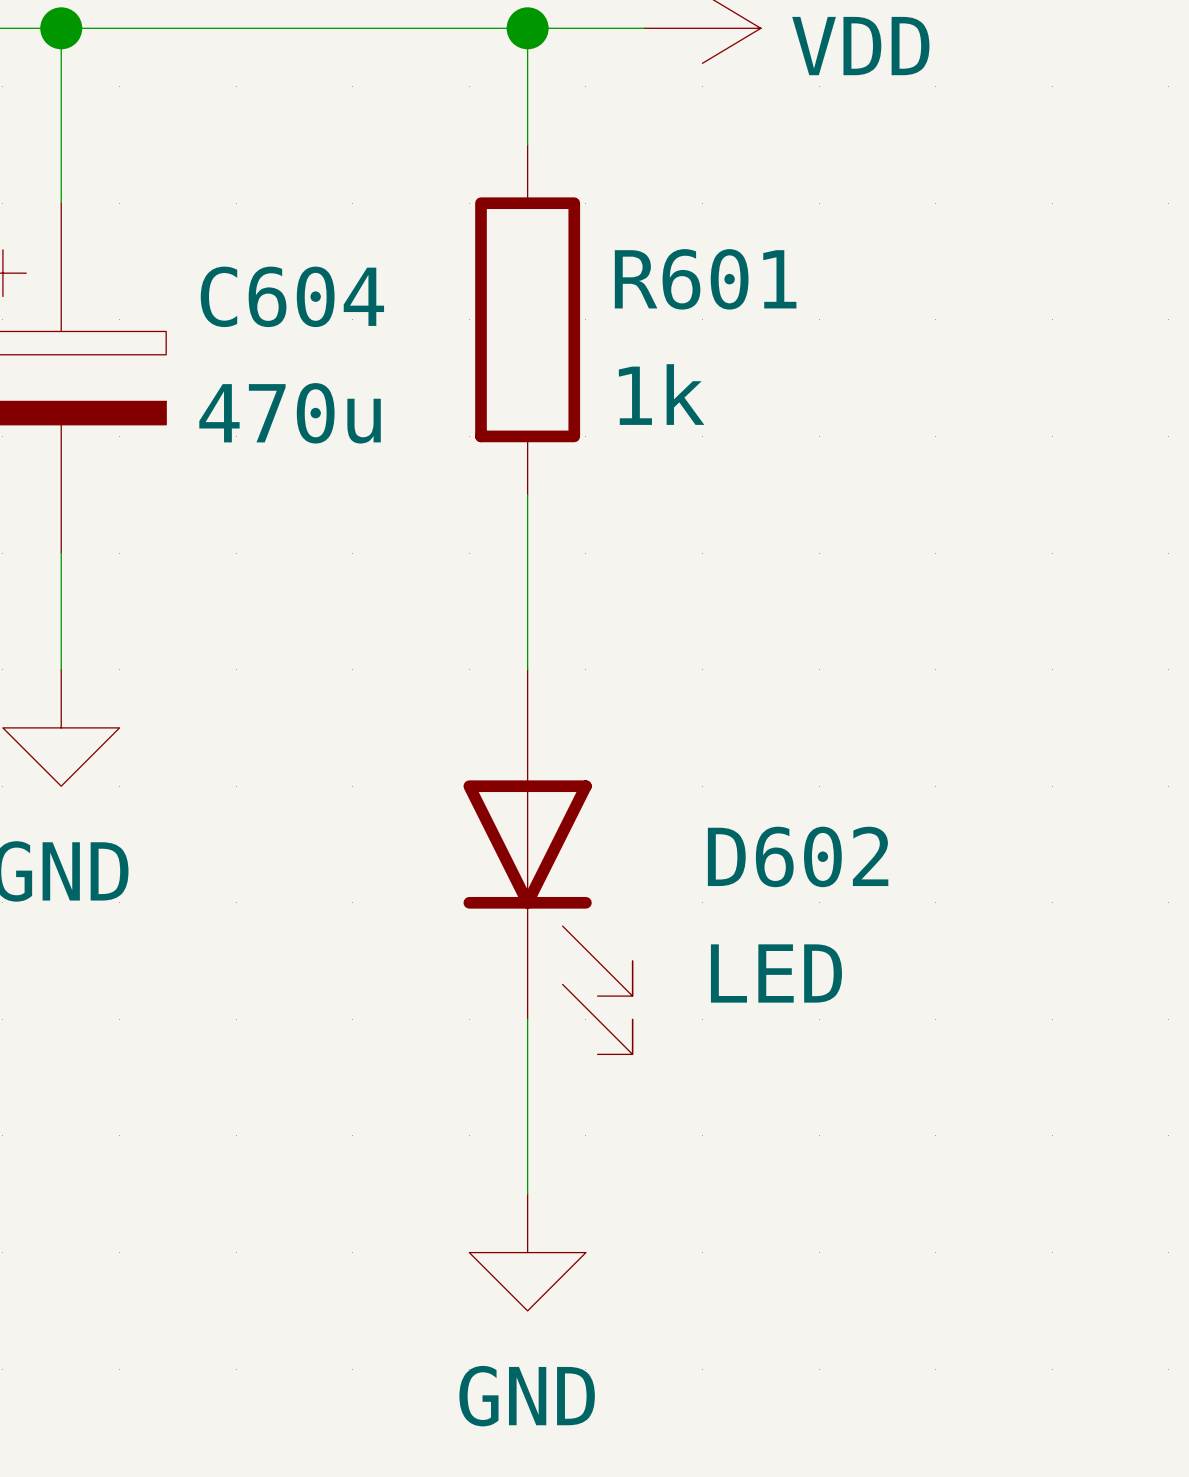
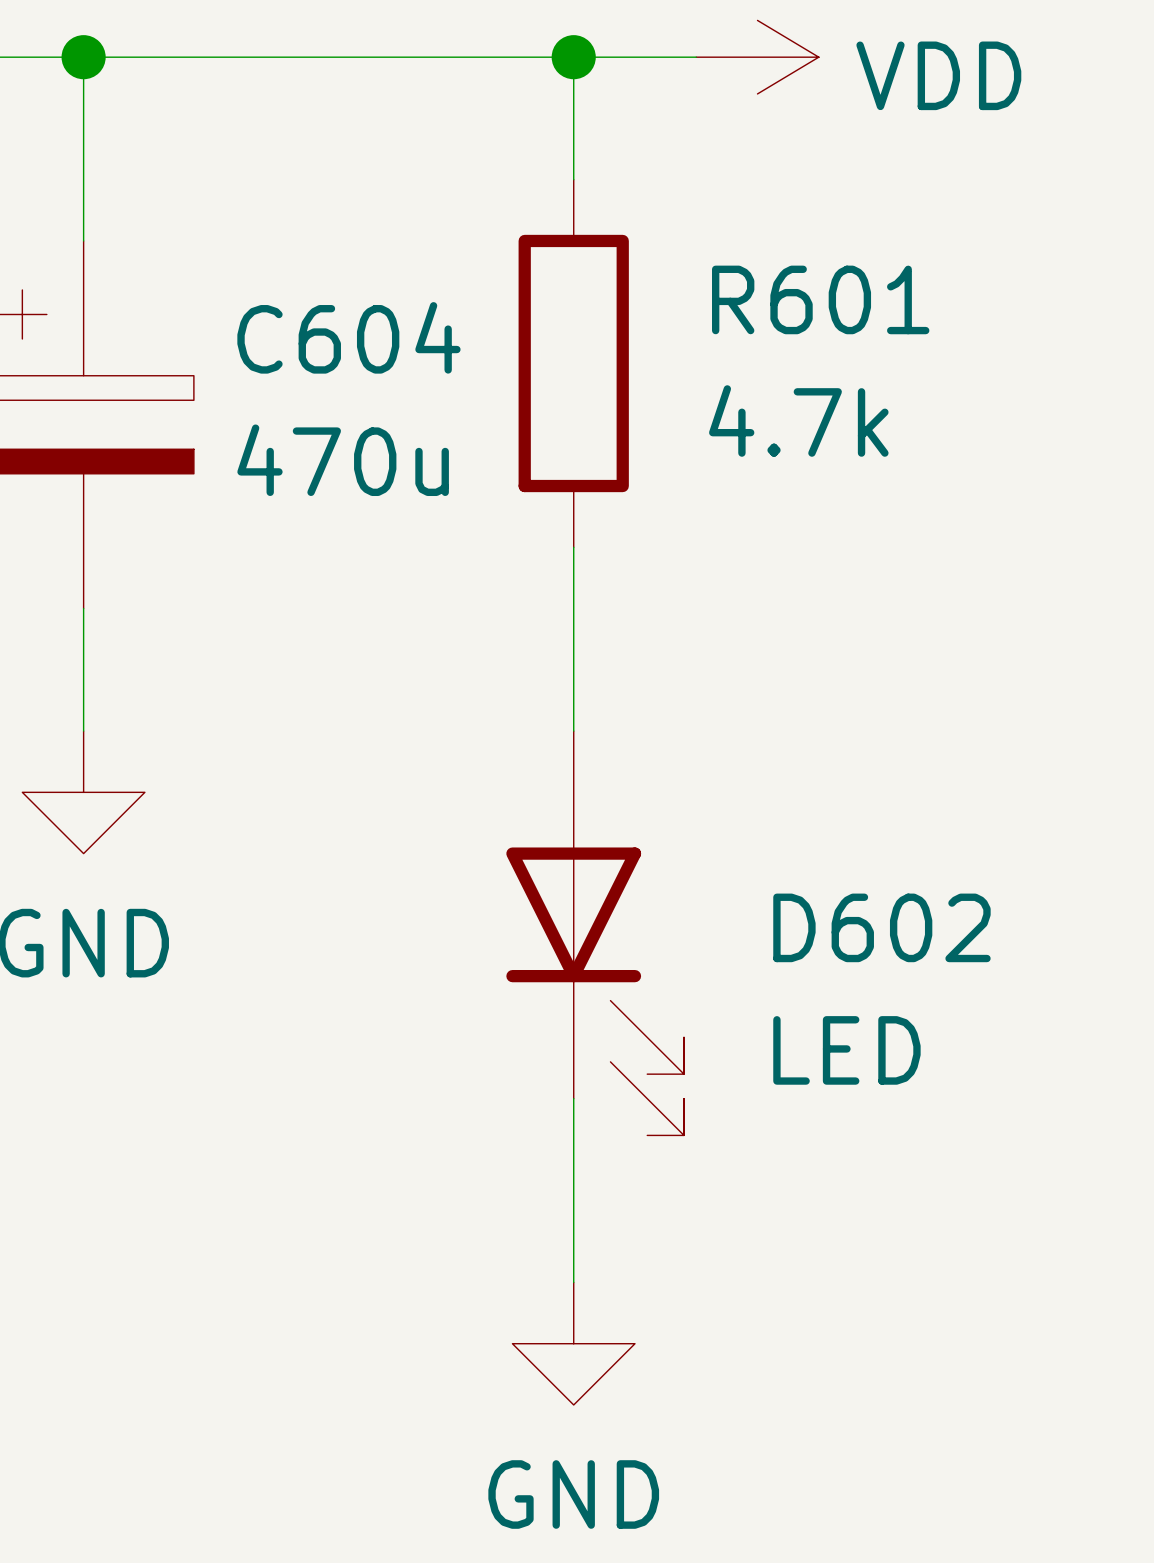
R601 name position: R601 (705, 279) -> R601 (820, 299)
R601 value: 1k (661, 394) -> 4.7k (798, 421)

